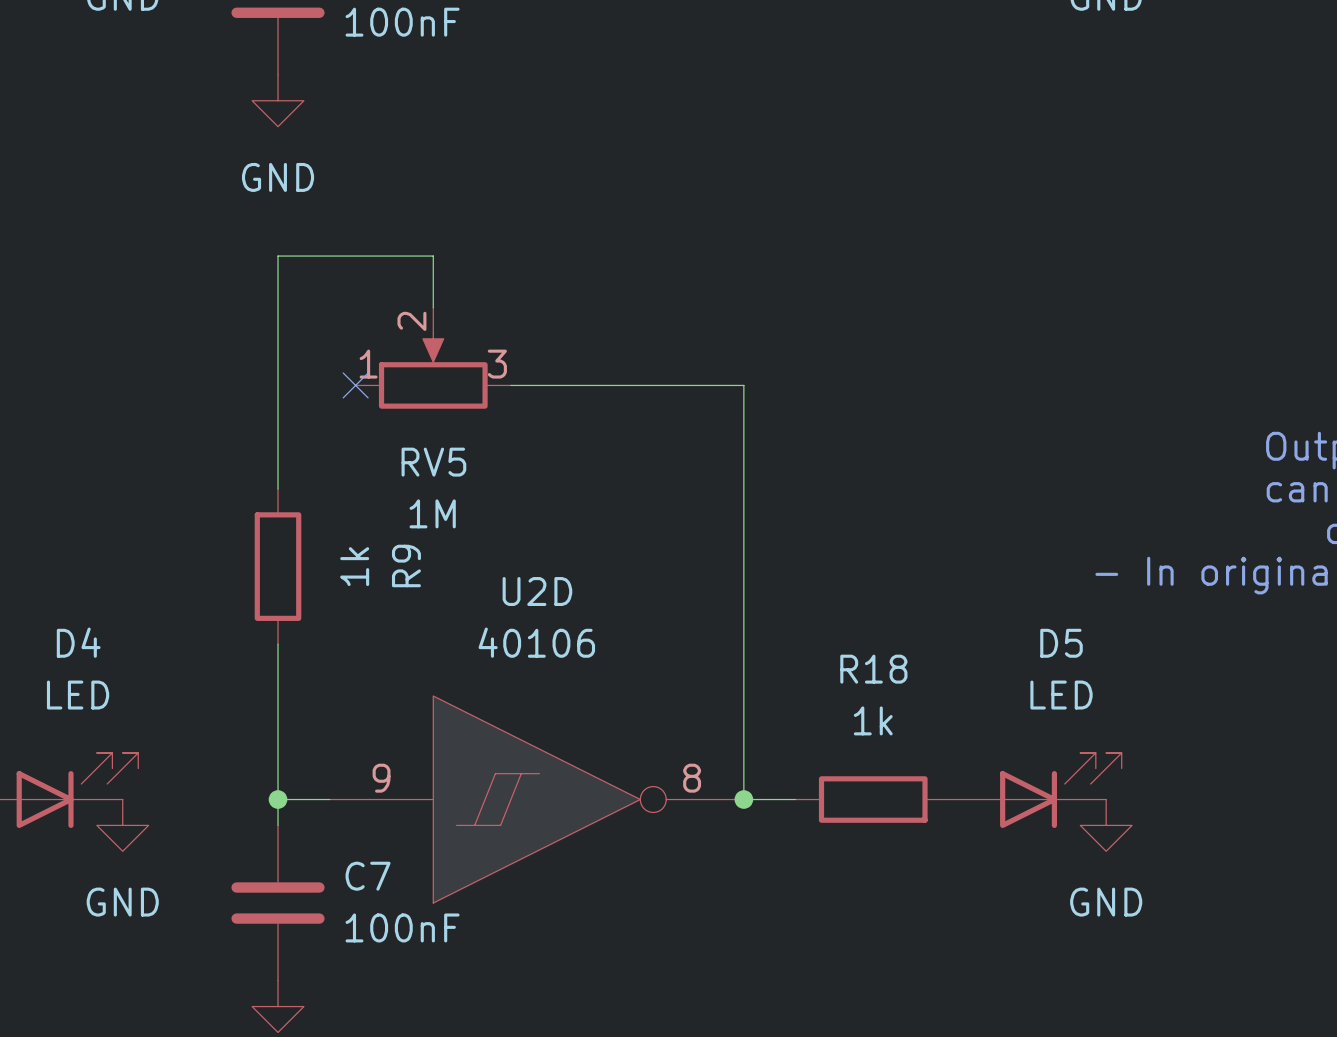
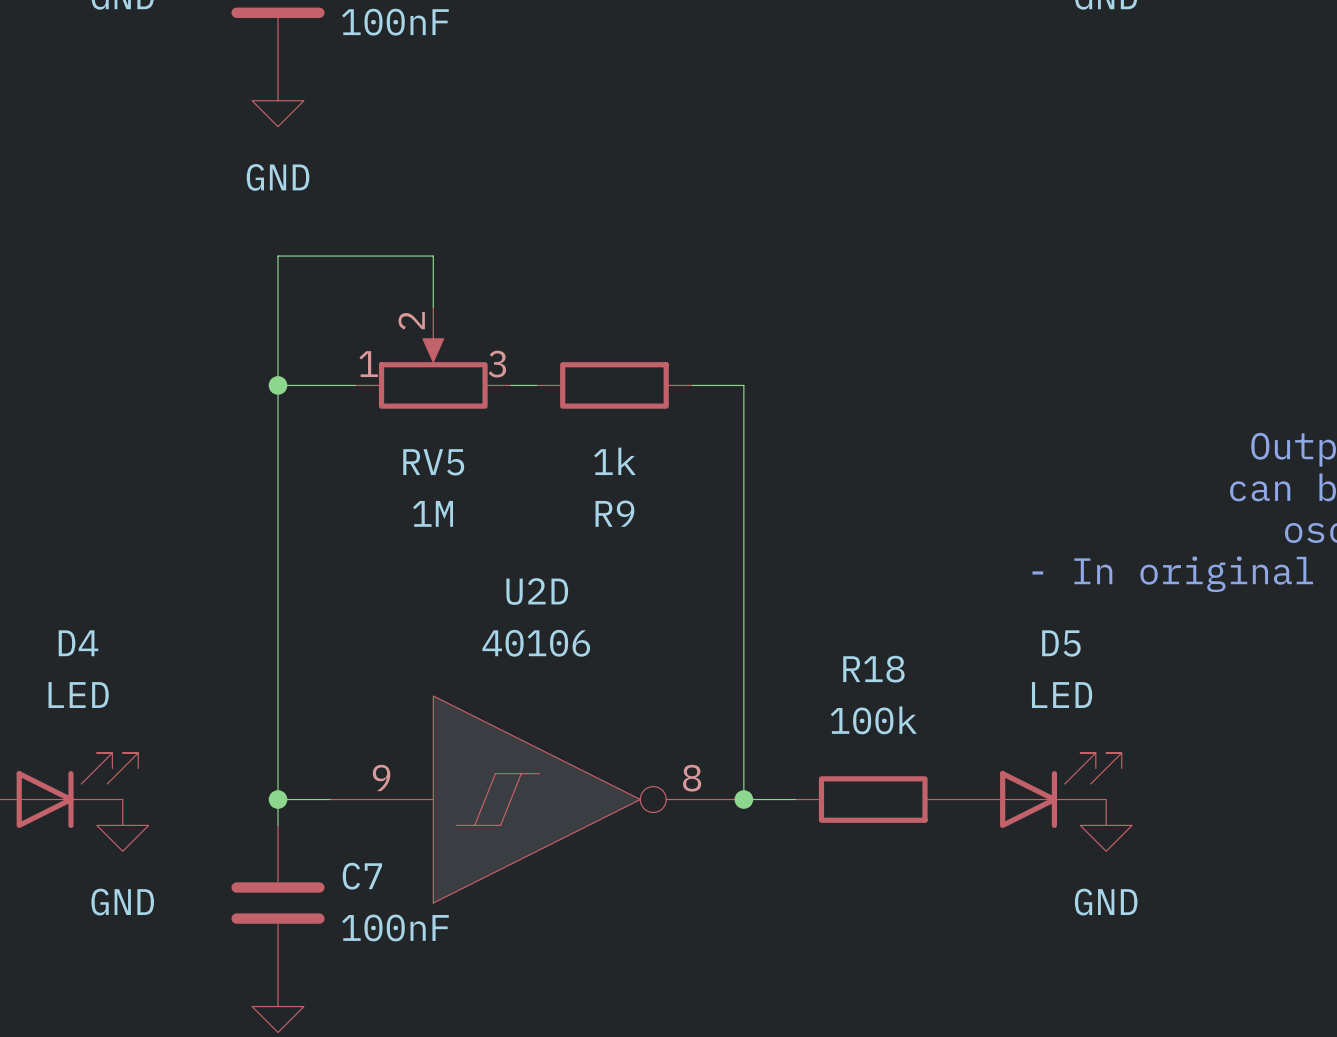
wire: none -> (278, 385) (355, 385)
junction: none -> (278, 385)
no-connect mark: (355, 385) -> none
wire: (536, 385) (692, 385) -> none
wire: none -> (278, 488) (278, 644)
R9 rotation: 0° (278, 566) -> 90° clockwise (614, 385)
R9 position: (278, 566) -> (614, 385)
R18 value: 1k (873, 720) -> 100k (873, 720)

